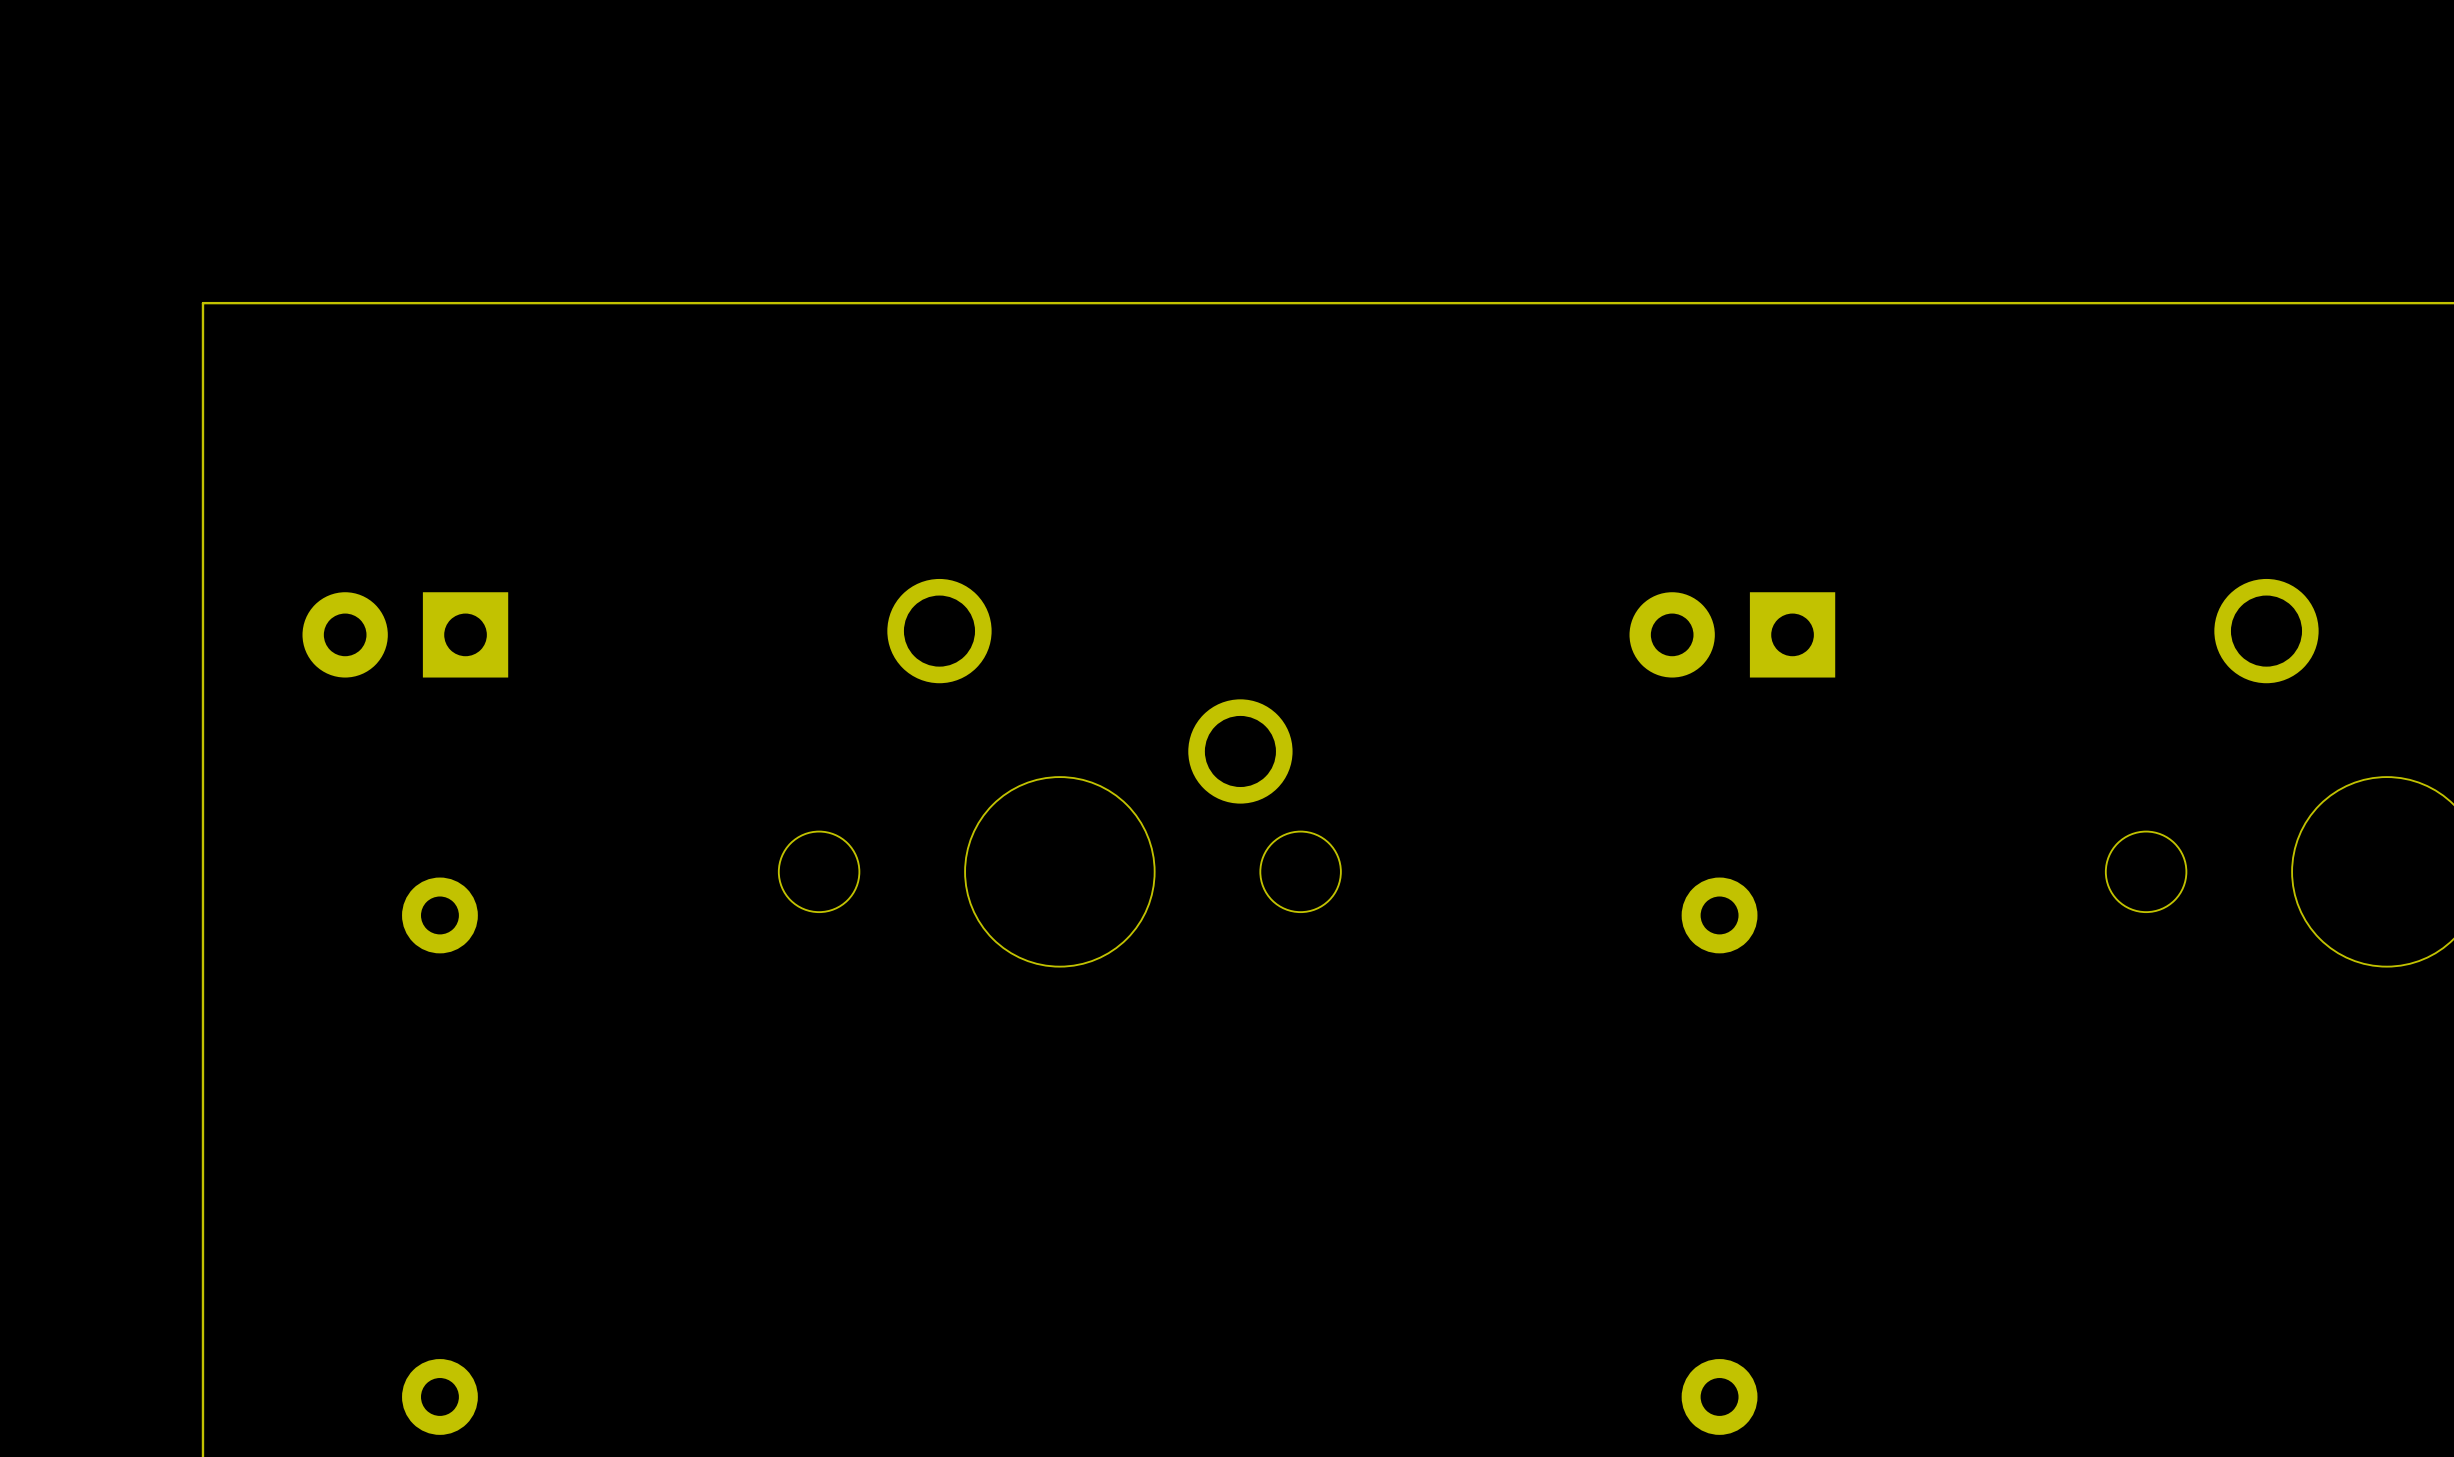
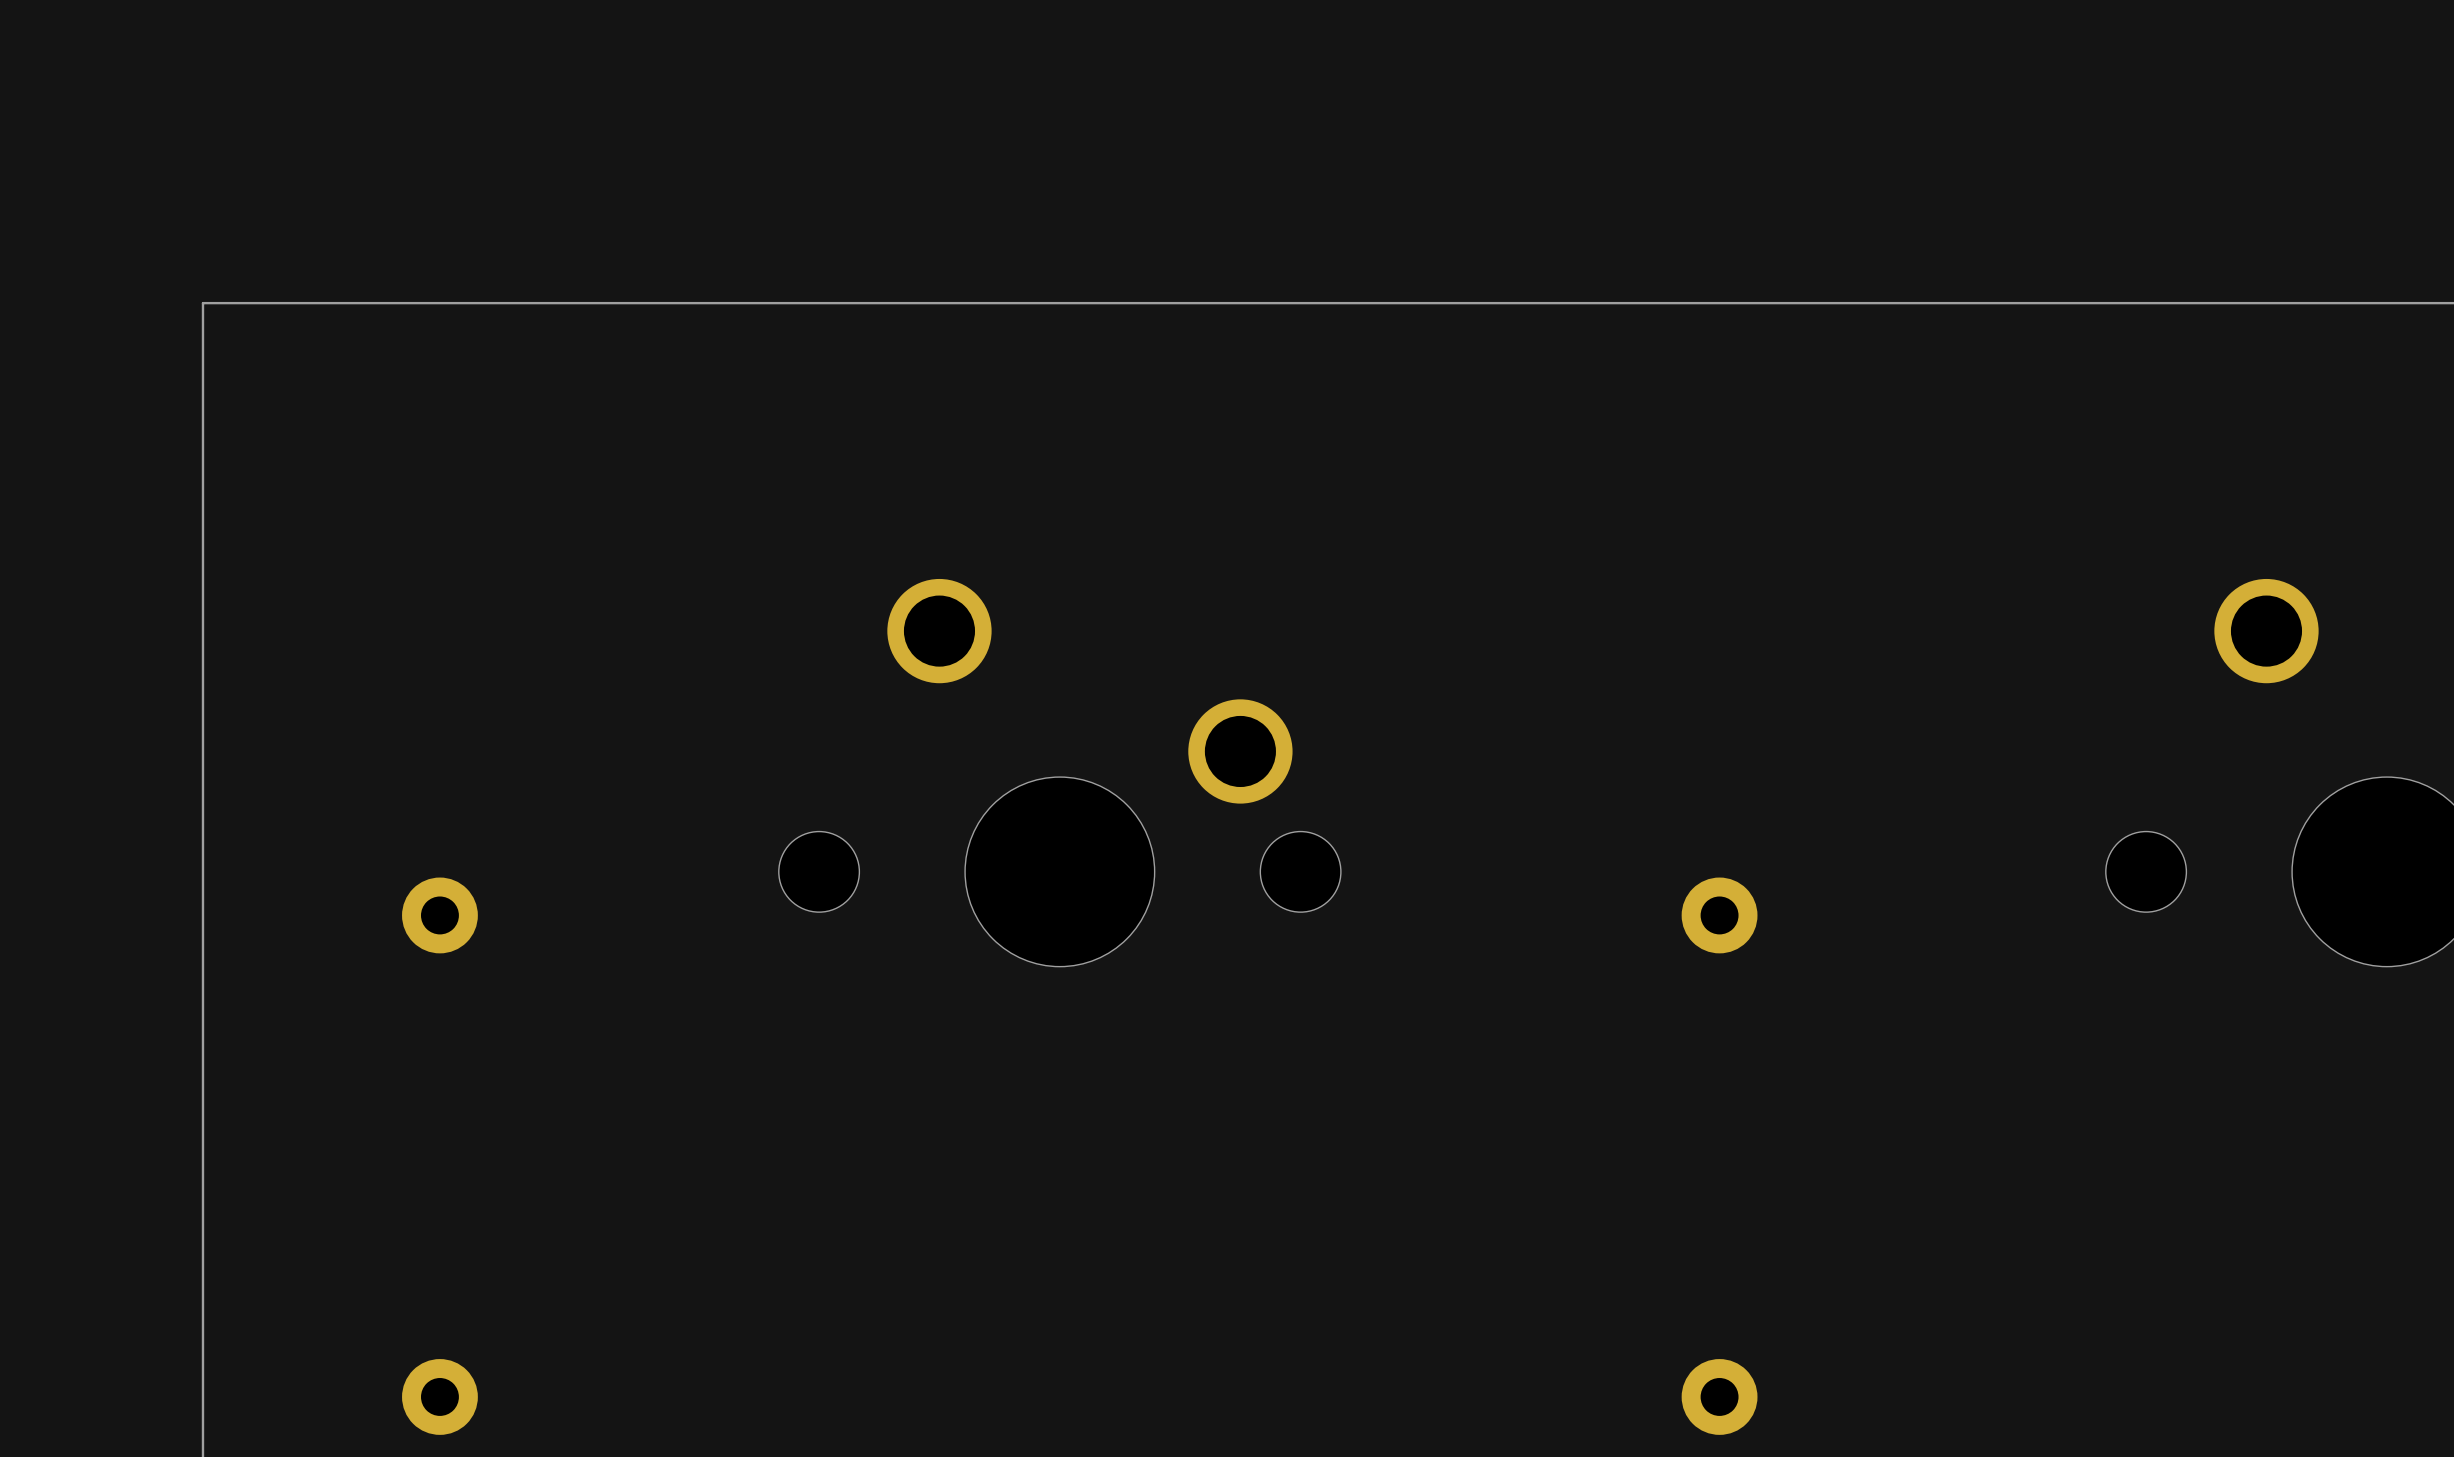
part: (405, 634) -> none
part: (1732, 634) -> none

